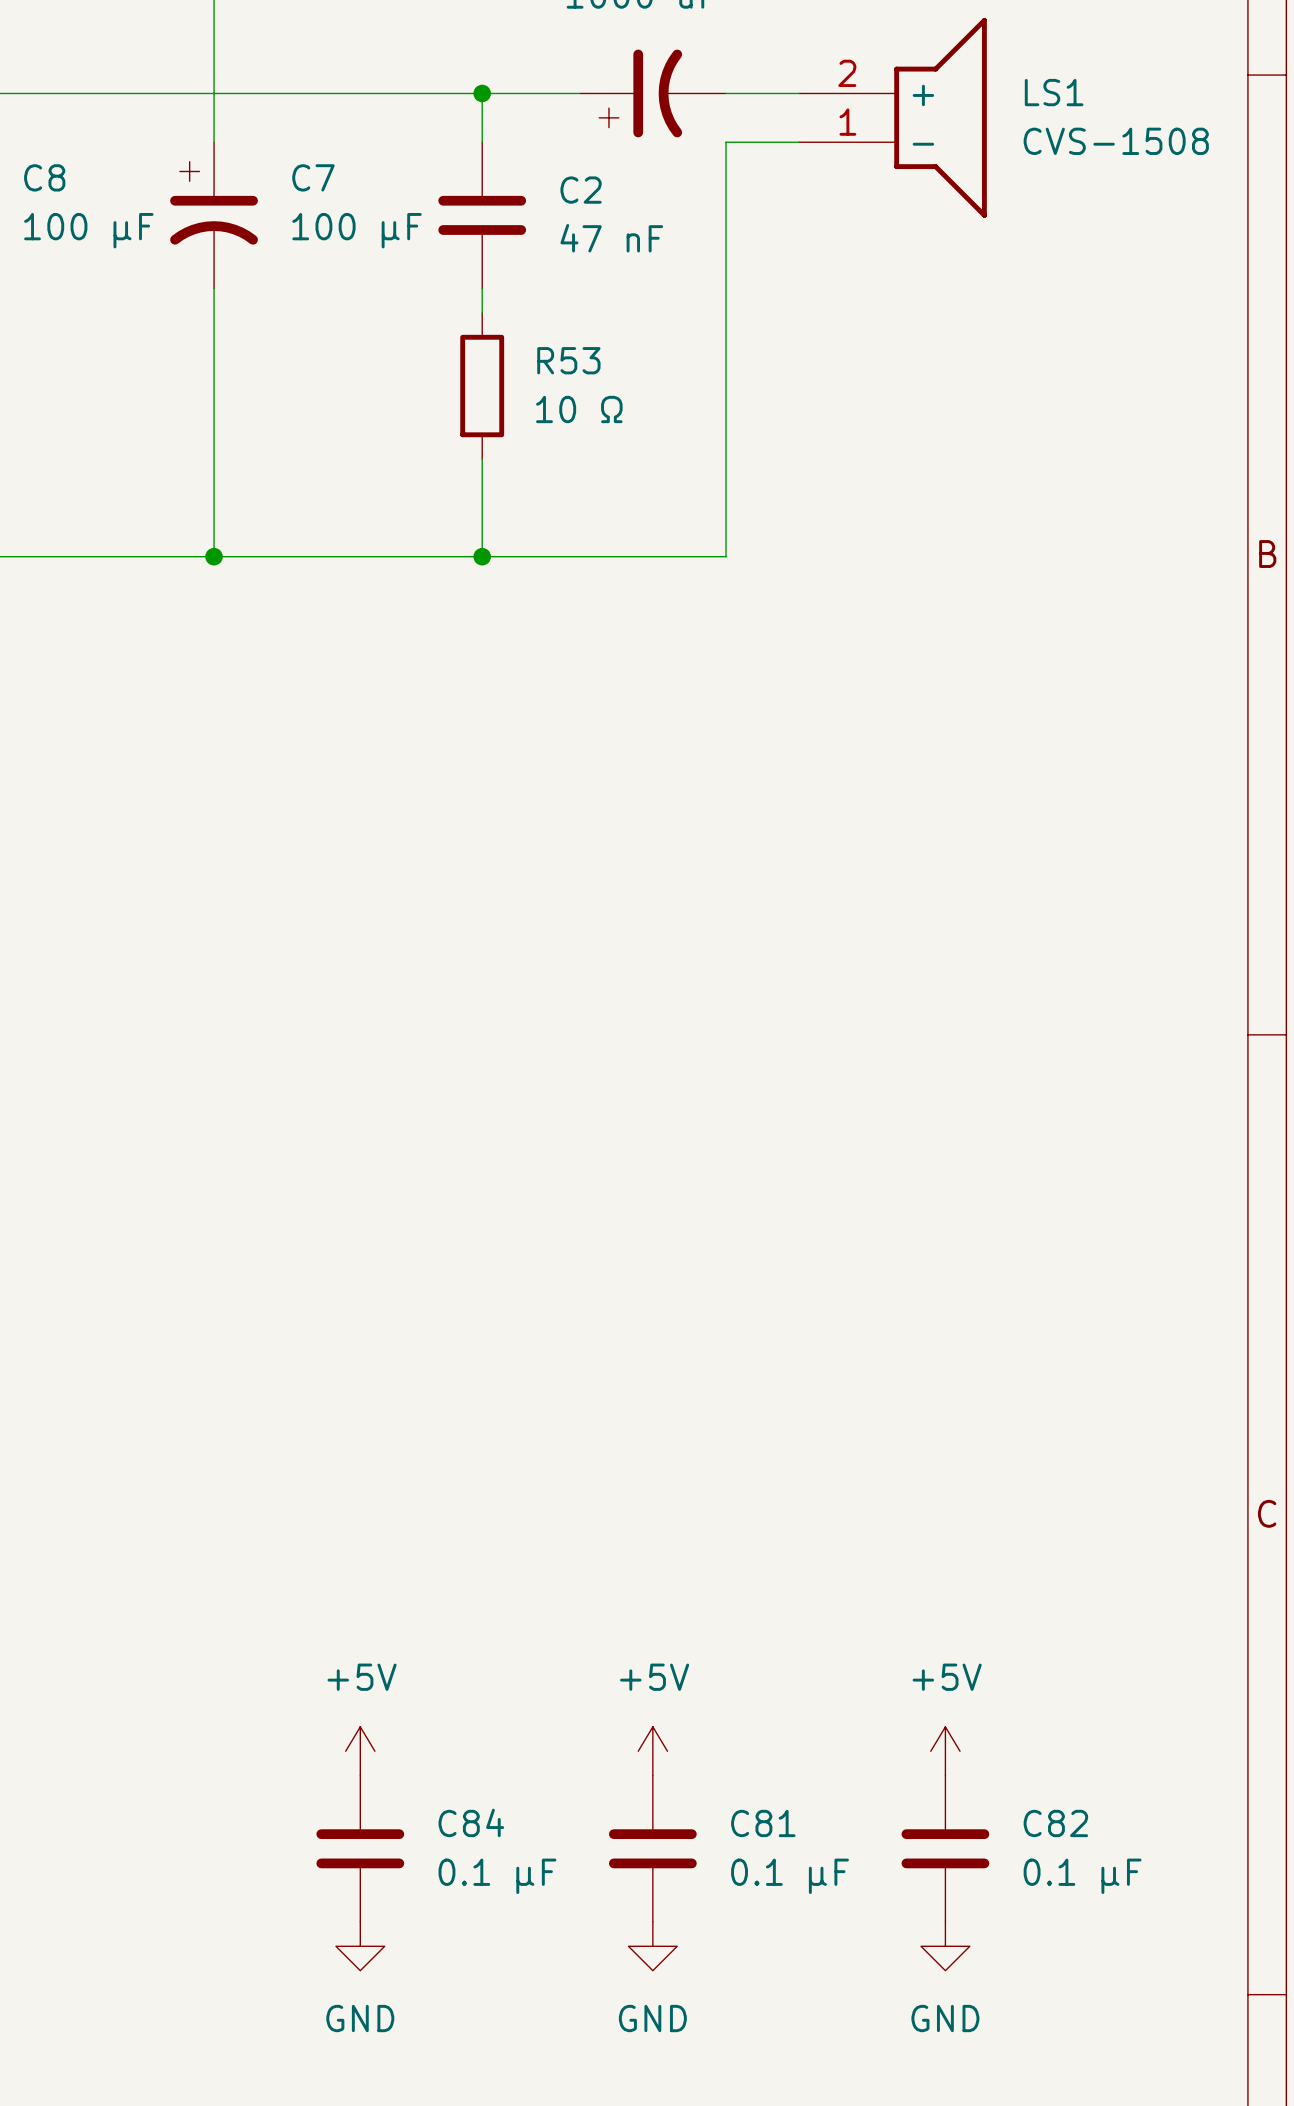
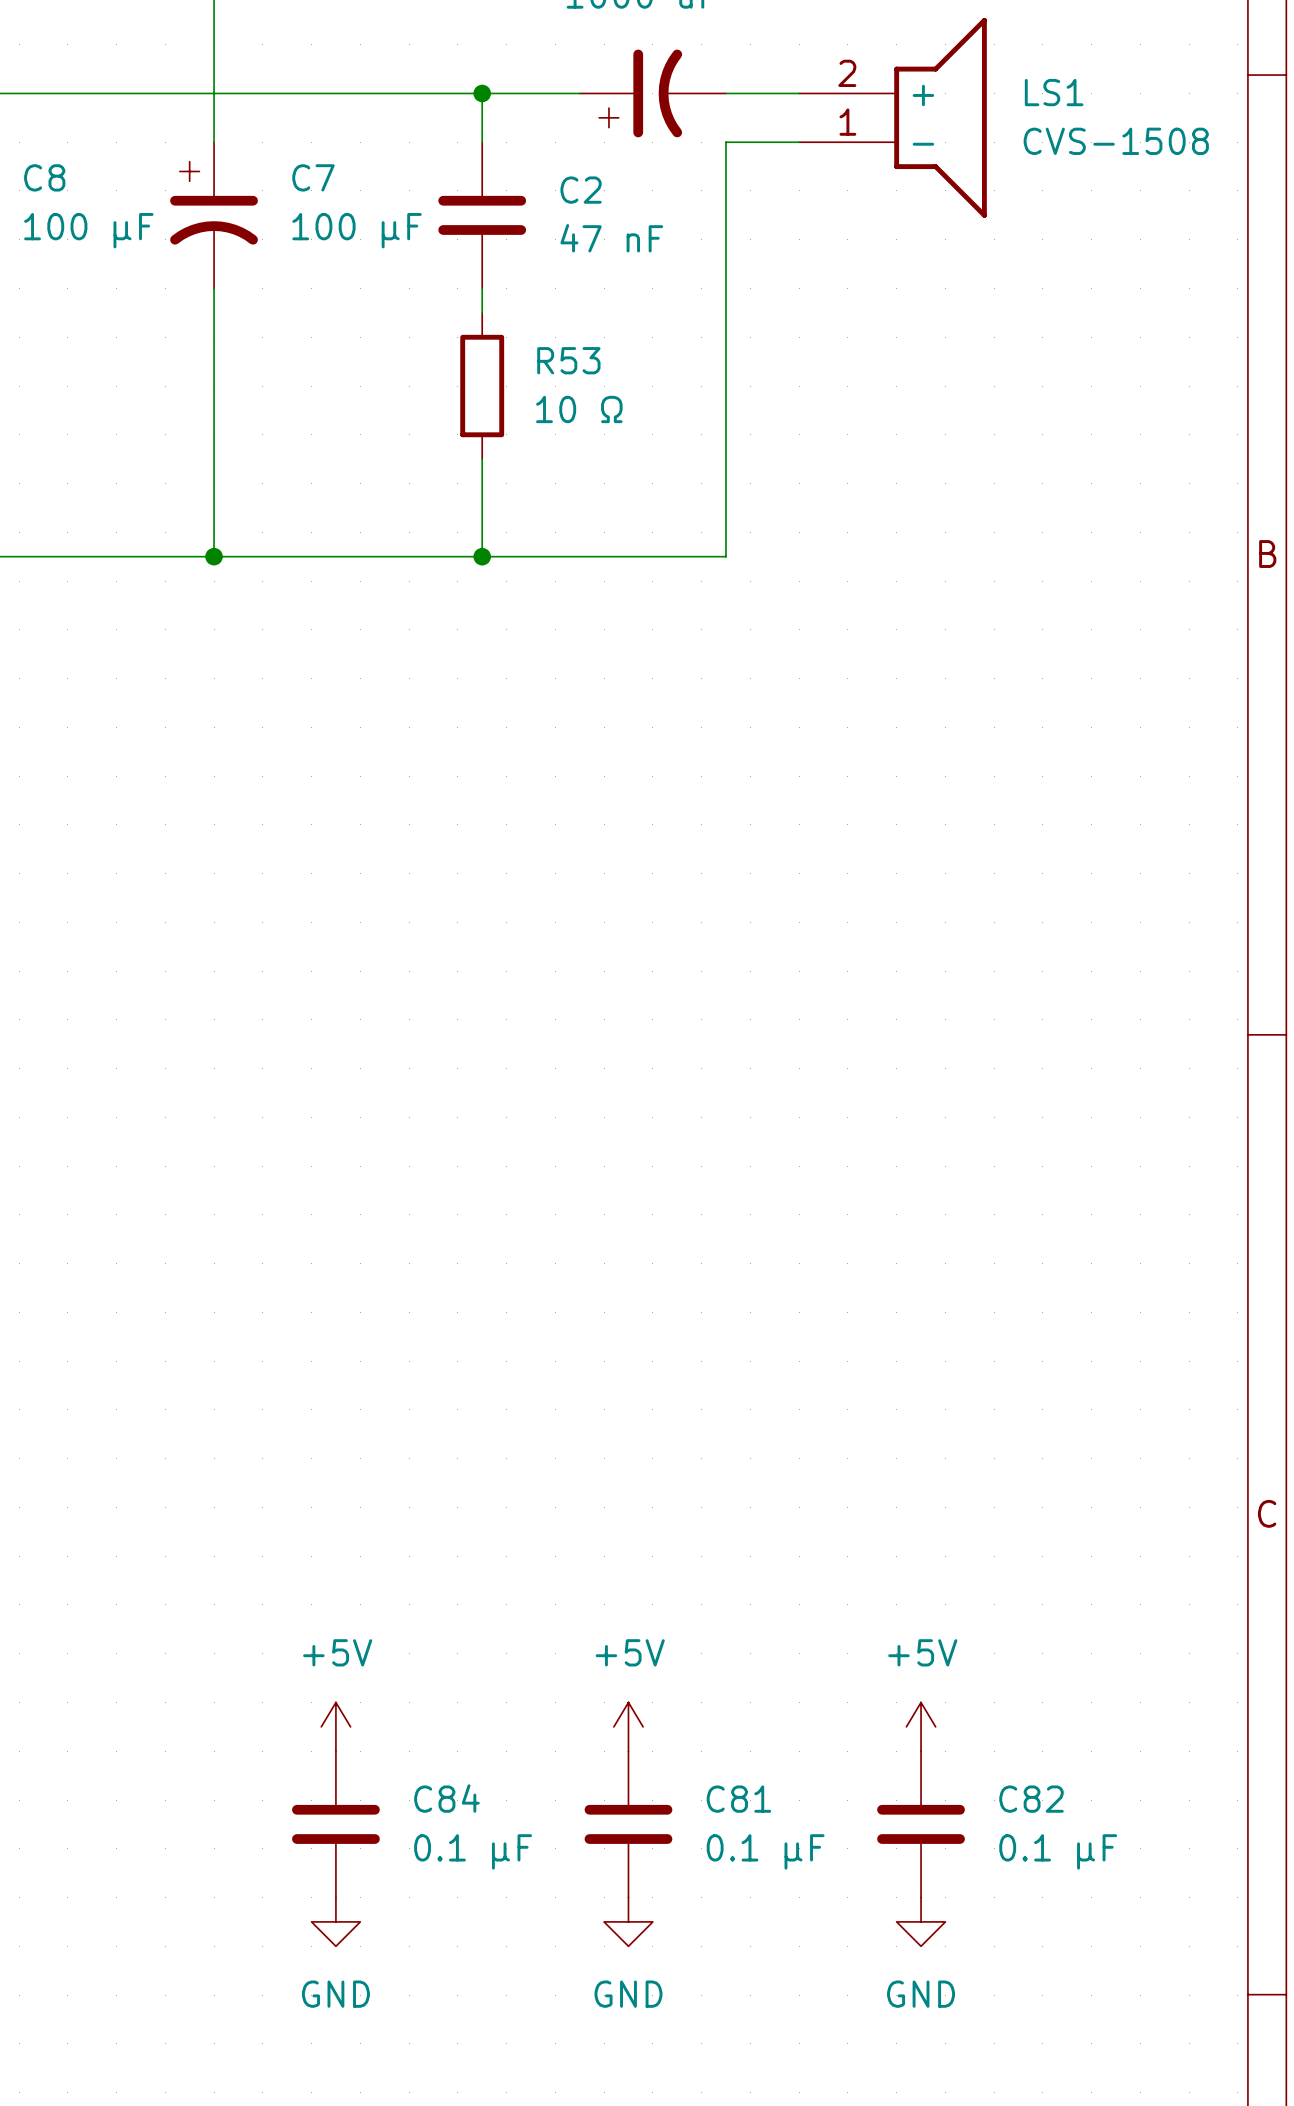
power symbol position: +5V (360, 1751) -> +5V (335, 1726)
power symbol position: +5V (652, 1751) -> +5V (628, 1726)
power symbol position: +5V (945, 1751) -> +5V (921, 1726)
C84 position: (360, 1848) -> (335, 1824)
C81 position: (652, 1848) -> (628, 1824)
C82 position: (945, 1848) -> (921, 1824)
power symbol position: GND (360, 1946) -> GND (335, 1921)
power symbol position: GND (652, 1946) -> GND (628, 1921)
power symbol position: GND (945, 1946) -> GND (921, 1921)

